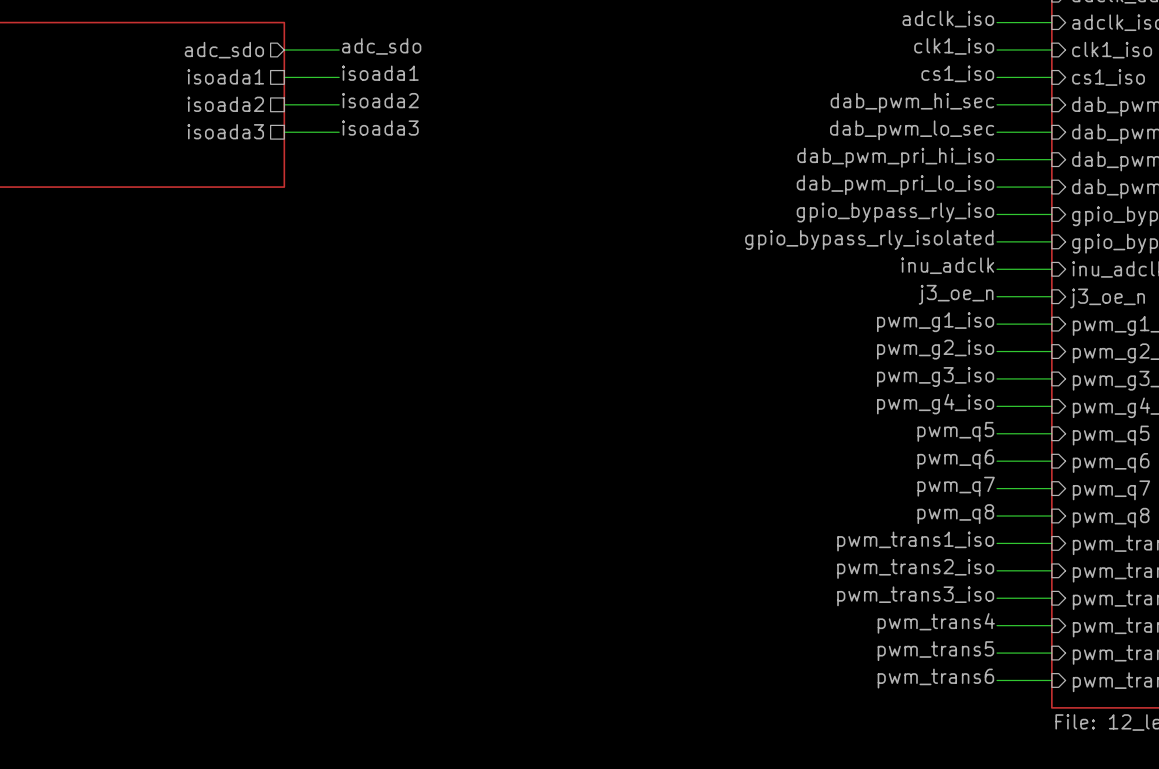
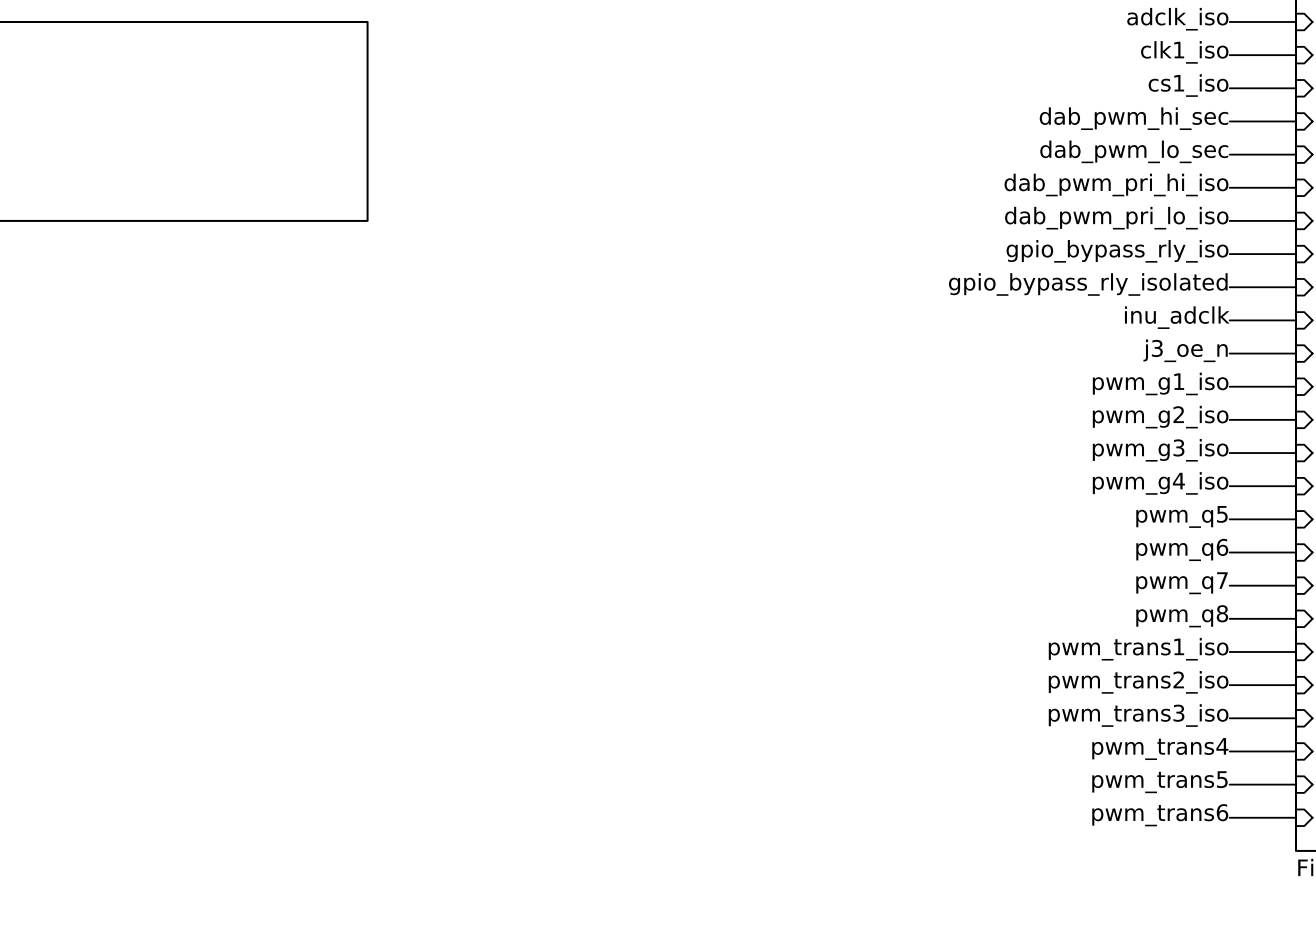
label: adc_sdo (381, 46) -> none
sheet pin: adc_sdo (224, 50) -> none
wire: (284, 50) (339, 50) -> none
label: isoada1 (380, 73) -> none
sheet pin: isoada1 (225, 76) -> none
wire: (284, 77) (339, 77) -> none
label: isoada2 (380, 100) -> none
sheet pin: isoada2 (225, 104) -> none
wire: (284, 104) (339, 104) -> none
label: isoada3 (380, 128) -> none
sheet pin: isoada3 (225, 131) -> none
wire: (284, 132) (339, 132) -> none

